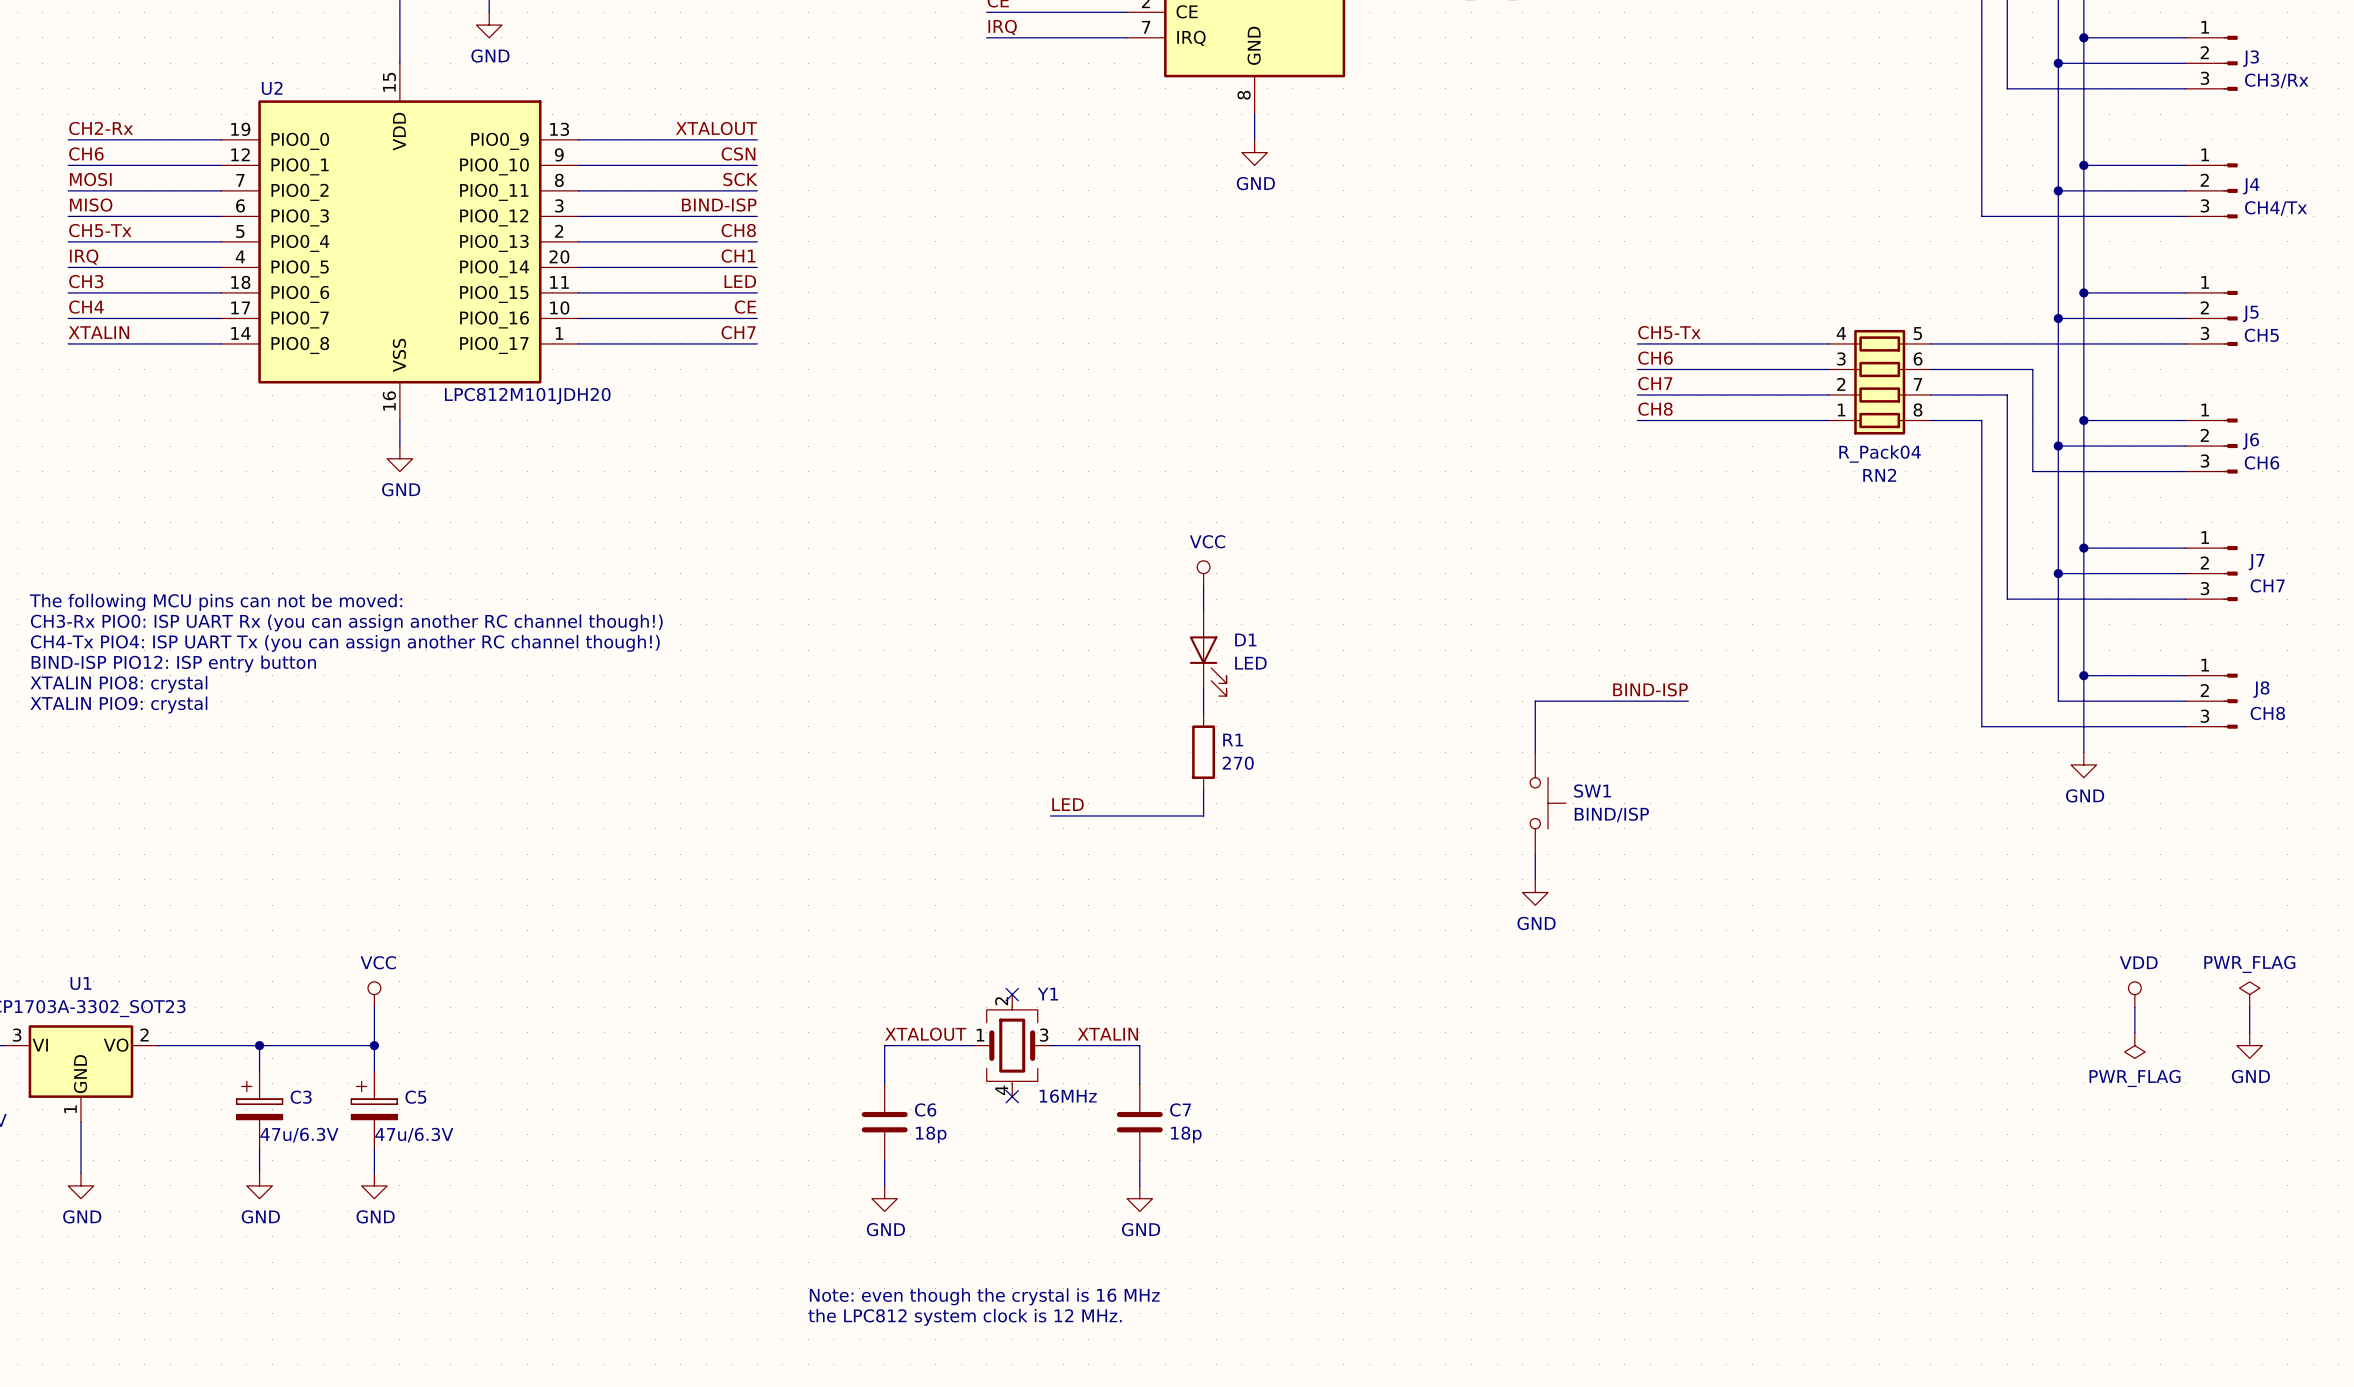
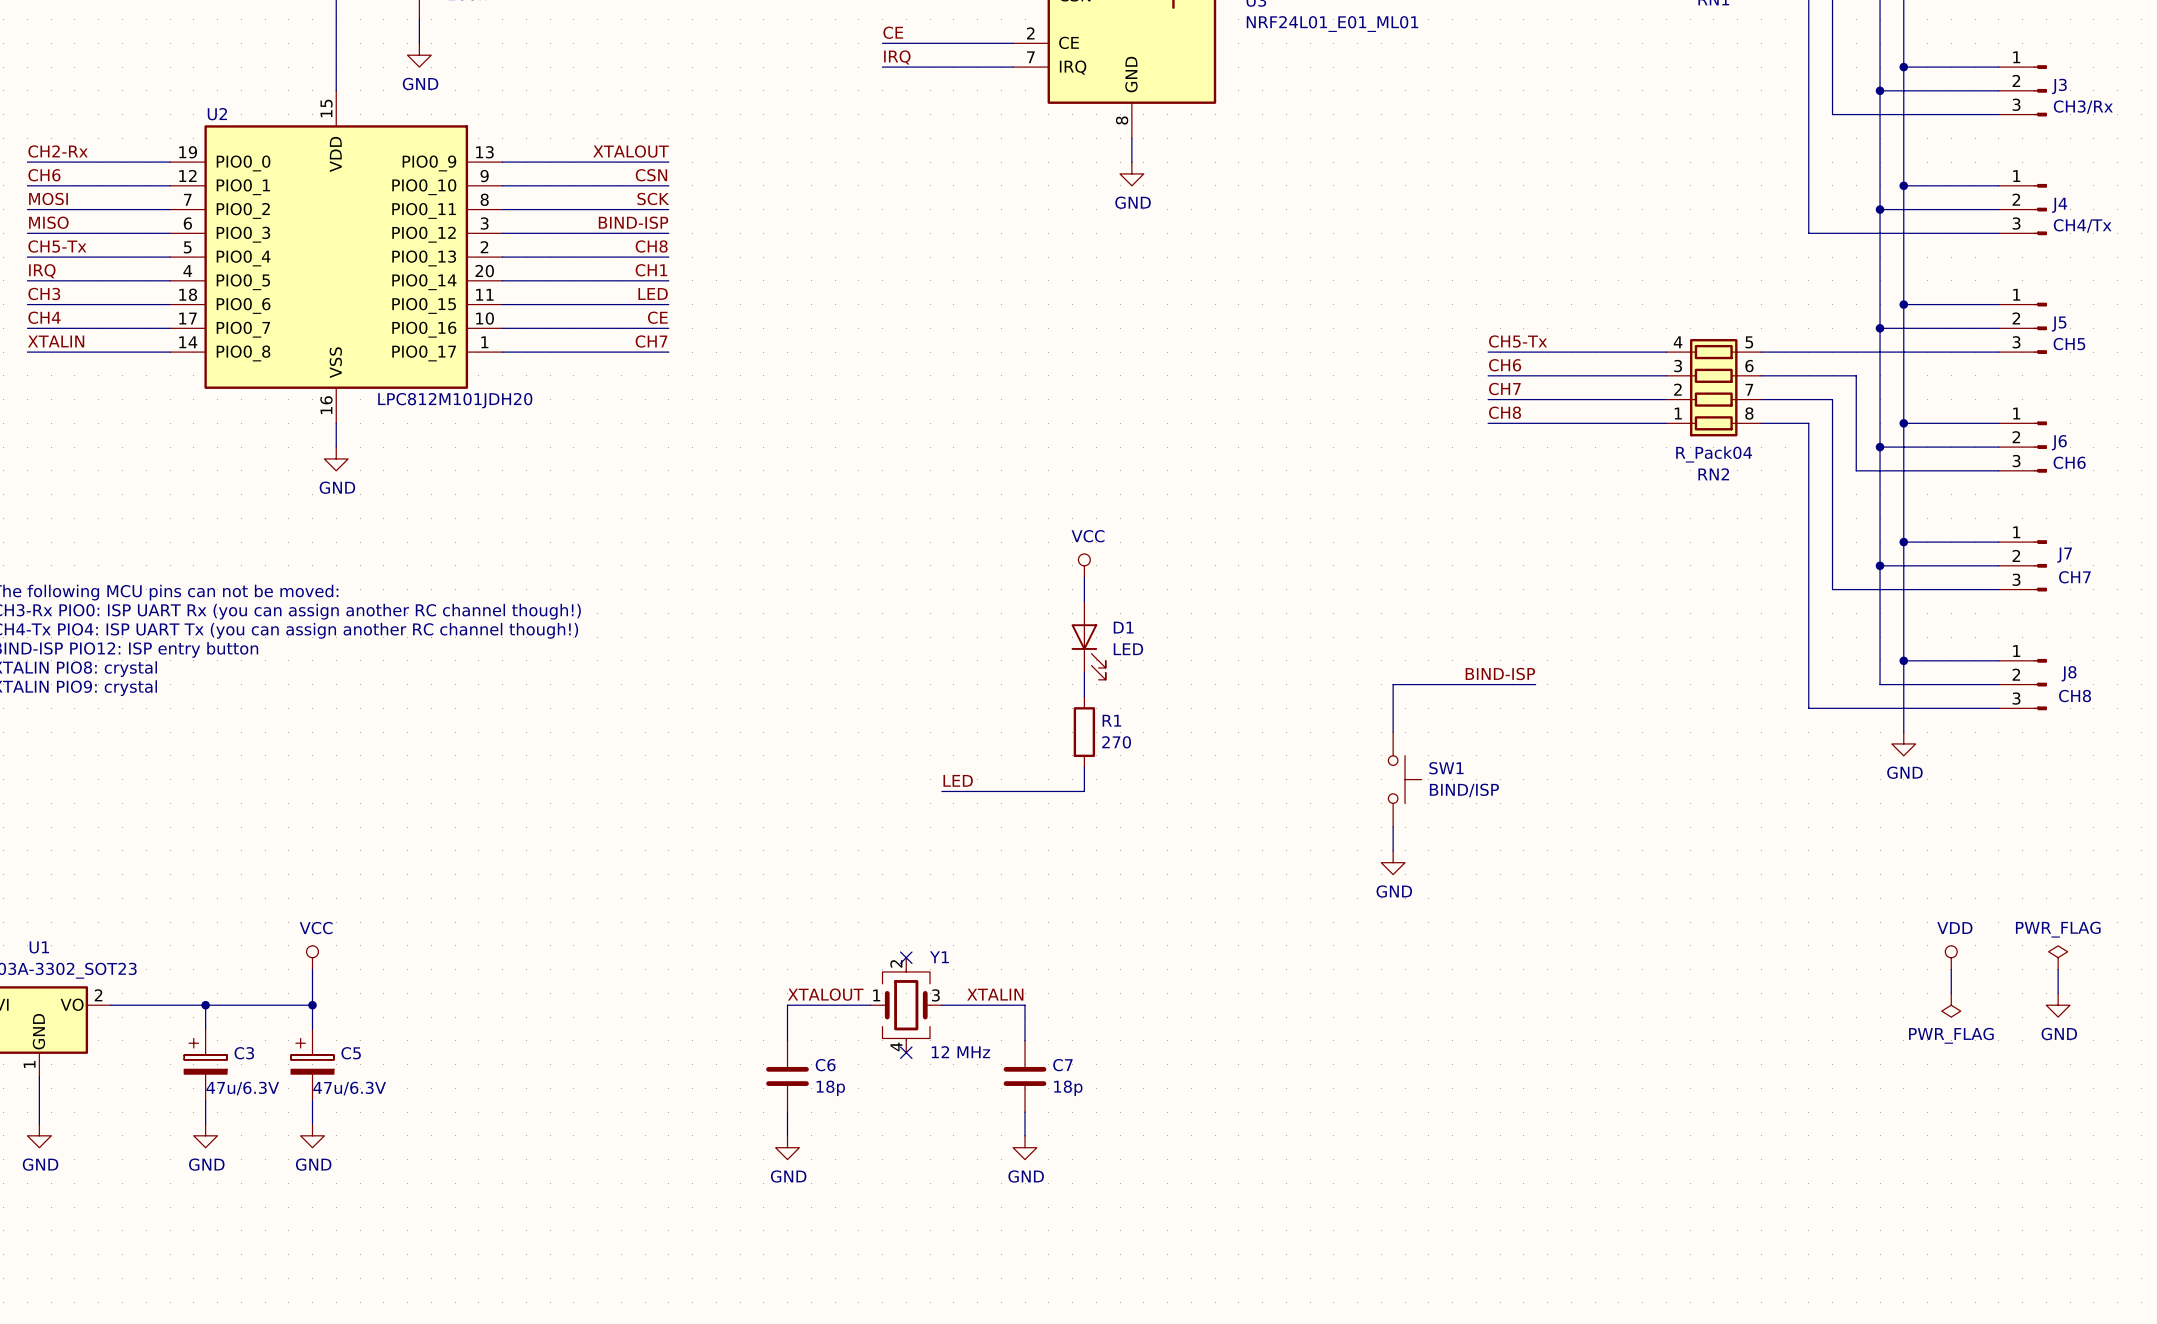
Y1 value: 16MHz (1068, 1096) -> 12 MHz (960, 1052)
text: Note: even though the crystal is 16 MHz (984, 1296) -> none
text: the LPC812 system clock is 12 MHz. (965, 1317) -> none

